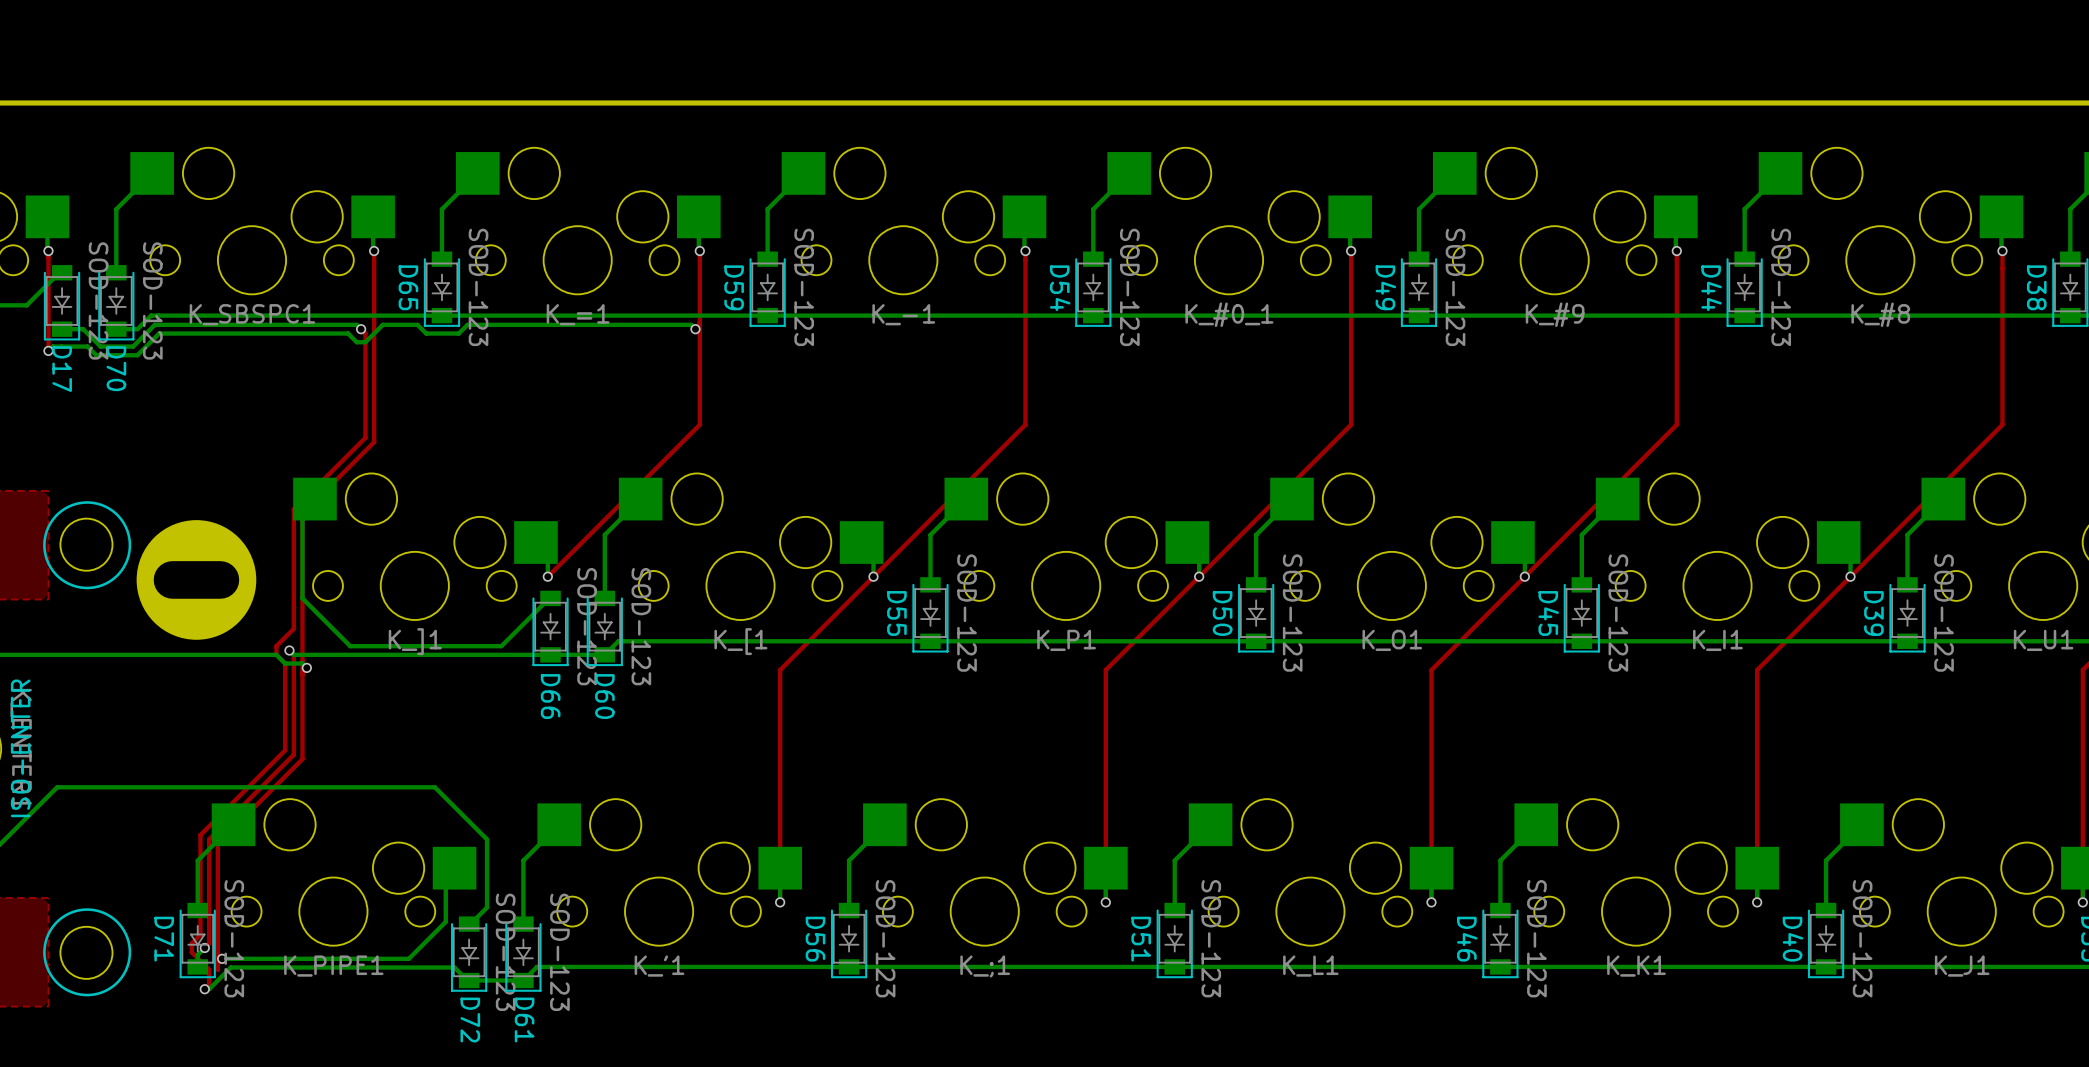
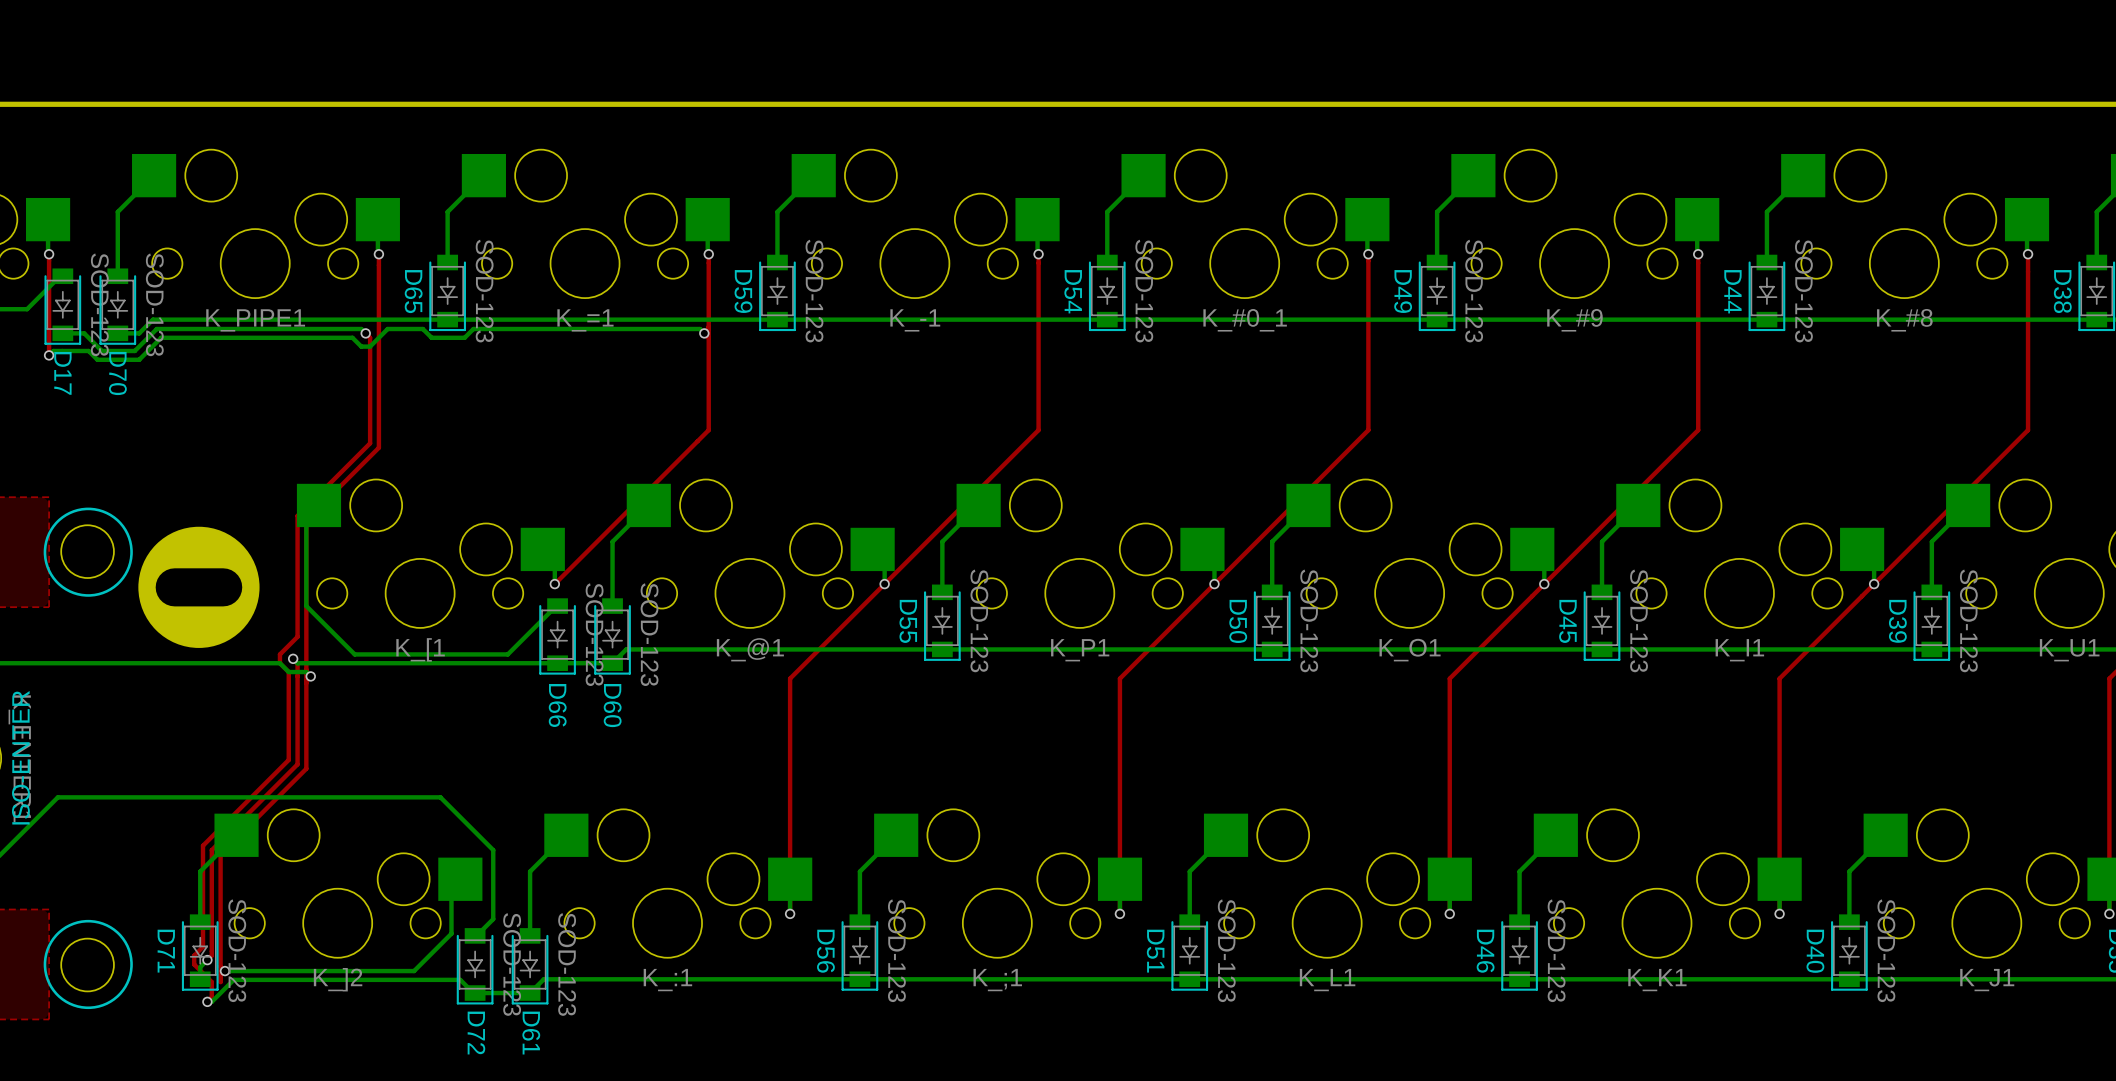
K_SBSPC1 name: K_SBSPC1 (252, 314) -> K_PIPE1 (255, 320)
K_]1 name: K_]1 (415, 641) -> K_[1 (420, 649)
K_[1 name: K_[1 (740, 641) -> K_@1 (750, 649)
K_PIPE1 name: K_PIPE1 (333, 966) -> K_]2 (338, 979)
K_'1 name: K_'1 (659, 966) -> K_:1 (667, 980)

